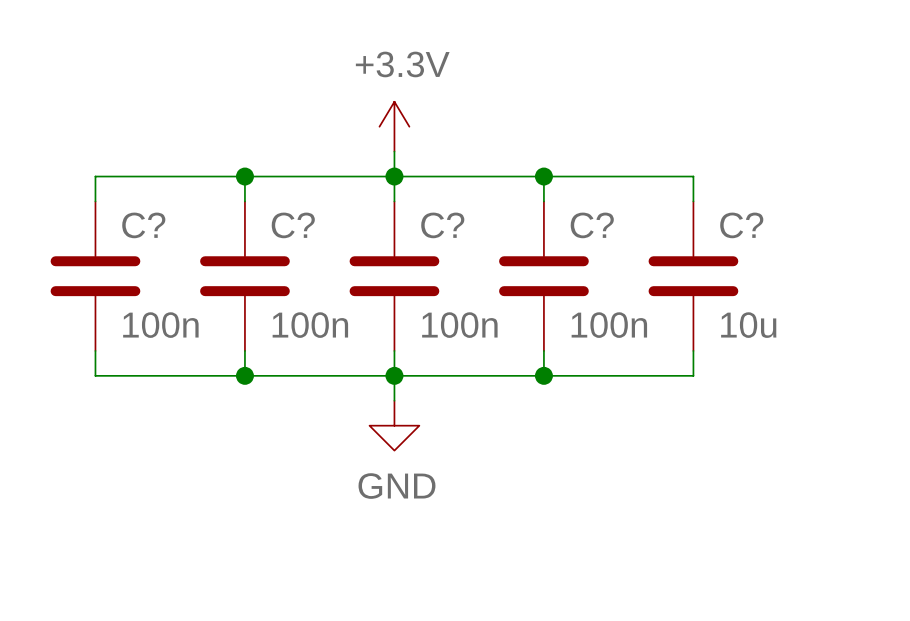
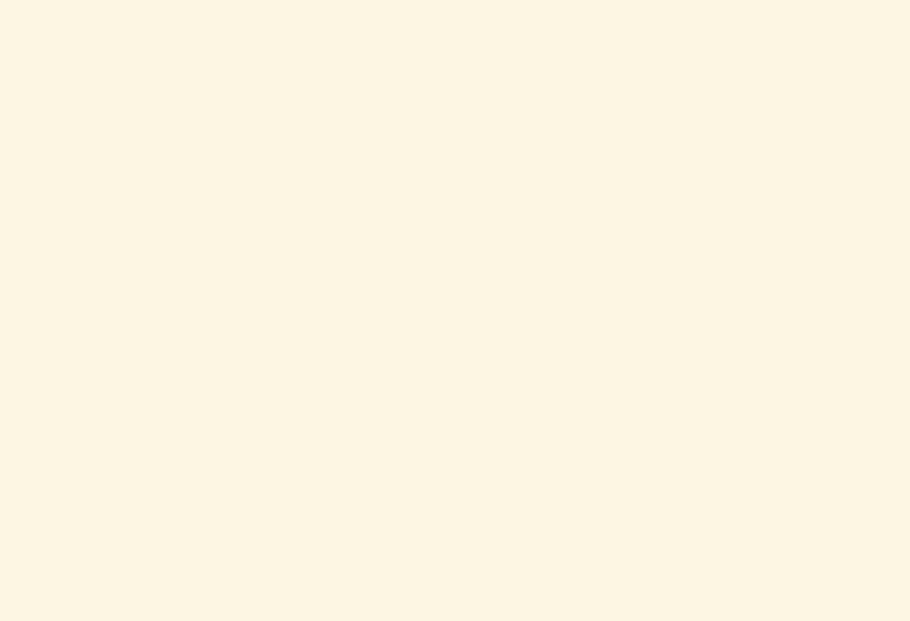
power symbol: +3.3V (394, 126) -> none
wire: (394, 151) (394, 201) -> none
wire: (244, 176) (244, 201) -> none
junction: (244, 176) -> none
junction: (394, 176) -> none
wire: (543, 176) (543, 201) -> none
junction: (543, 176) -> none
wire: (95, 201) (95, 176) (693, 176) (693, 201) -> none
C?: 100n (95, 276) -> none
C?: 100n (244, 276) -> none
C?: 100n (394, 276) -> none
C?: 100n (543, 276) -> none
C?: 10u (693, 276) -> none
wire: (95, 350) (95, 375) (693, 375) (693, 350) -> none
wire: (244, 350) (244, 375) -> none
wire: (394, 350) (394, 400) -> none
wire: (543, 350) (543, 375) -> none
junction: (244, 375) -> none
junction: (394, 375) -> none
junction: (543, 375) -> none
power symbol: GND (394, 425) -> none

